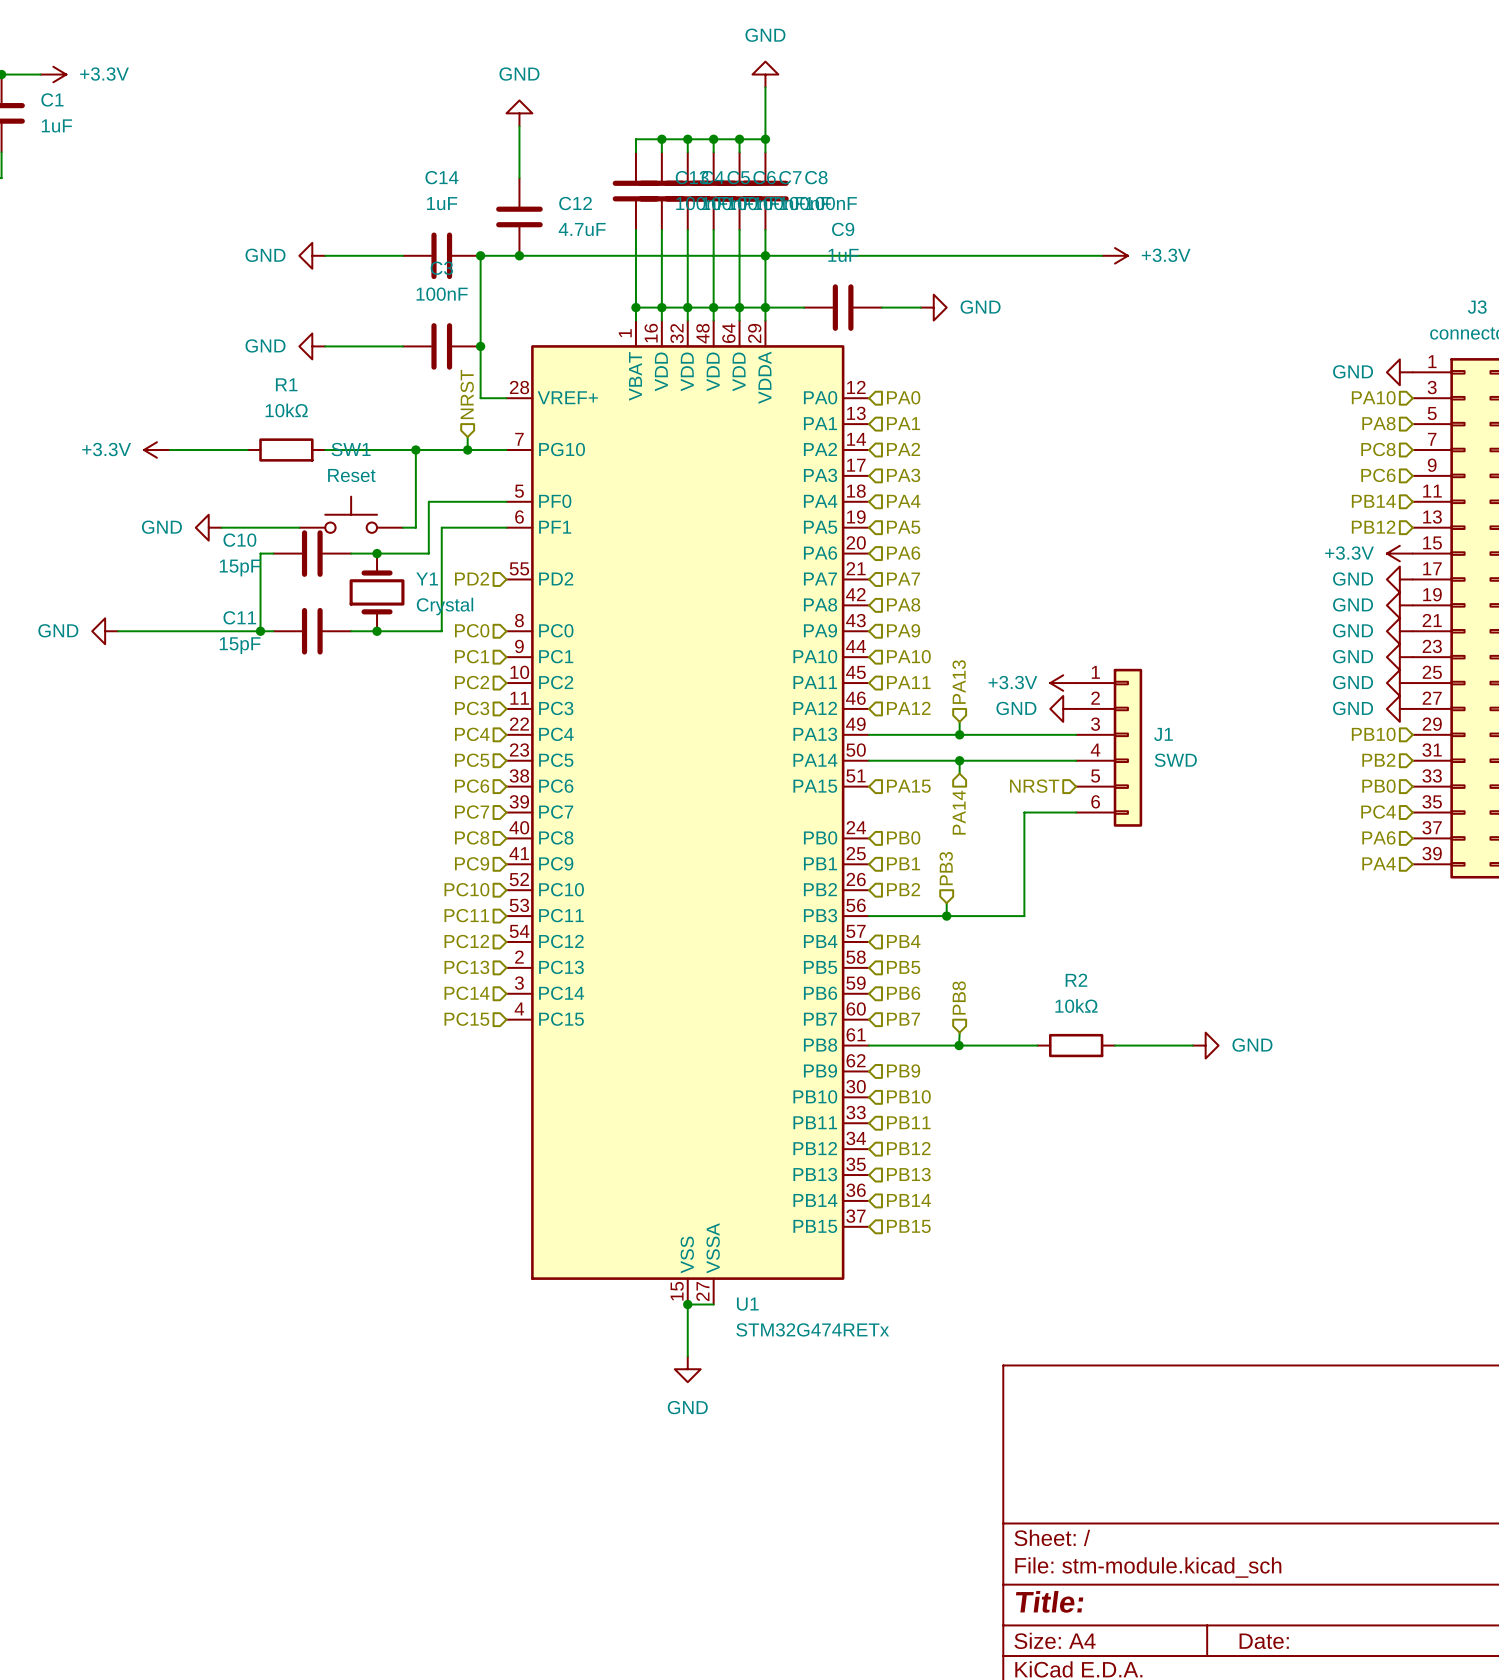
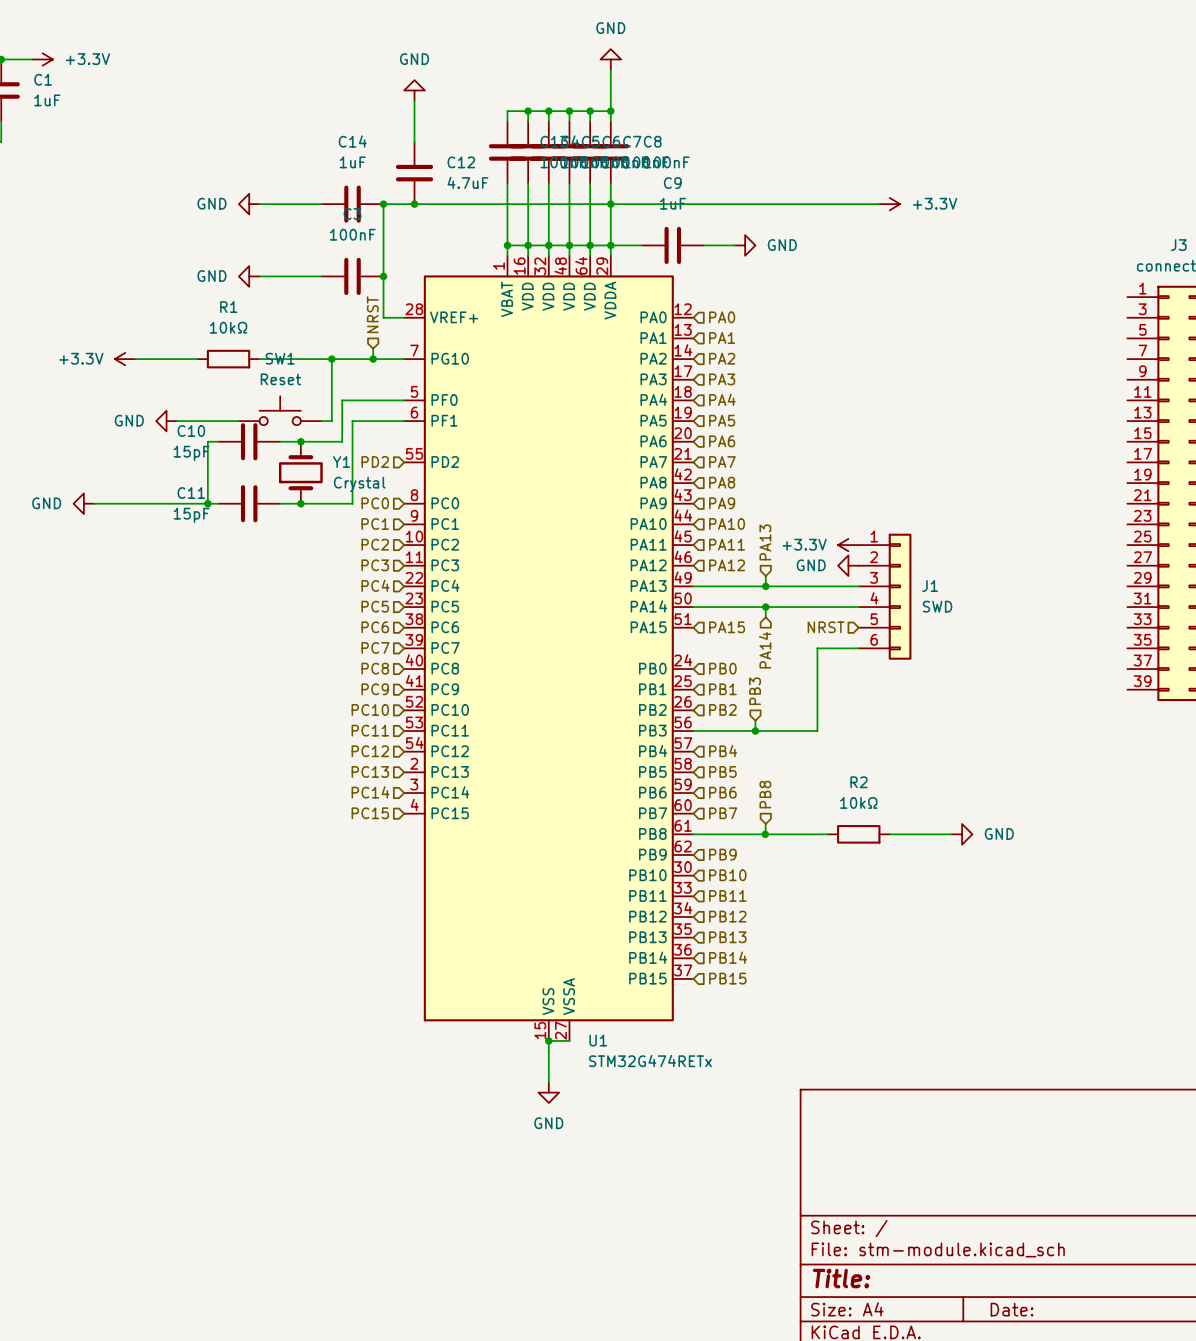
power symbol: GND (1399, 372) -> none
hierarchical label: PA10 (1373, 397) -> none
hierarchical label: PA8 (1378, 423) -> none
hierarchical label: PC8 (1378, 449) -> none
hierarchical label: PC6 (1378, 475) -> none
hierarchical label: PB14 (1373, 501) -> none
hierarchical label: PB12 (1373, 527) -> none
power symbol: +3.3V (1399, 553) -> none
power symbol: GND (1399, 579) -> none
power symbol: GND (1399, 605) -> none
power symbol: GND (1399, 631) -> none
power symbol: GND (1399, 657) -> none
power symbol: GND (1399, 683) -> none
power symbol: GND (1399, 708) -> none
hierarchical label: PB10 (1373, 734) -> none
hierarchical label: PB2 (1378, 760) -> none
hierarchical label: PB0 (1378, 786) -> none
hierarchical label: PC4 (1378, 812) -> none
hierarchical label: PA6 (1378, 837) -> none
hierarchical label: PA4 (1379, 863) -> none

